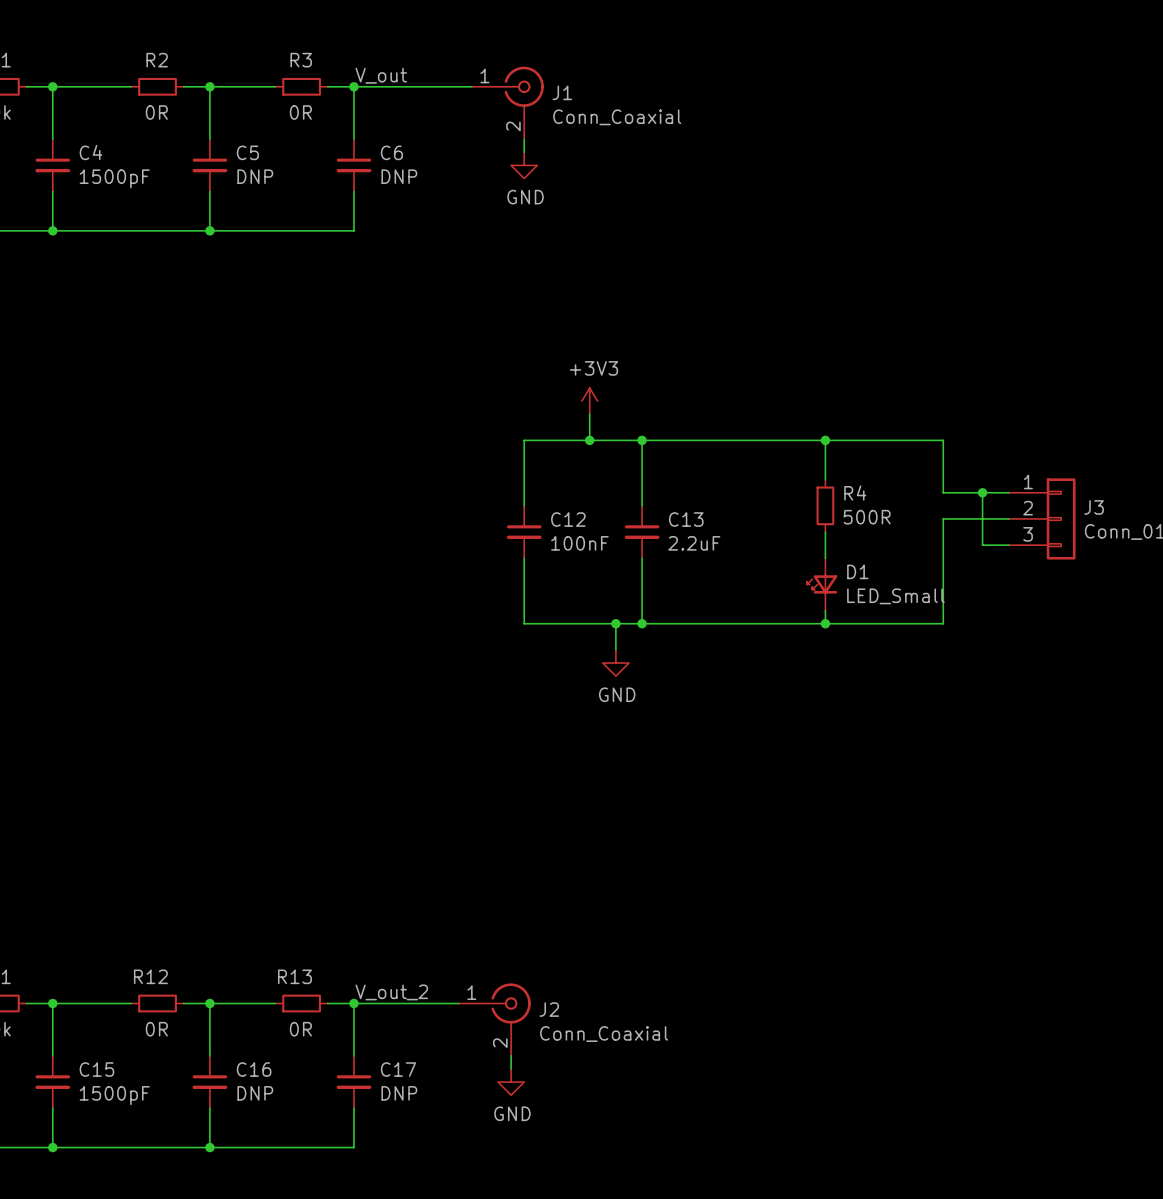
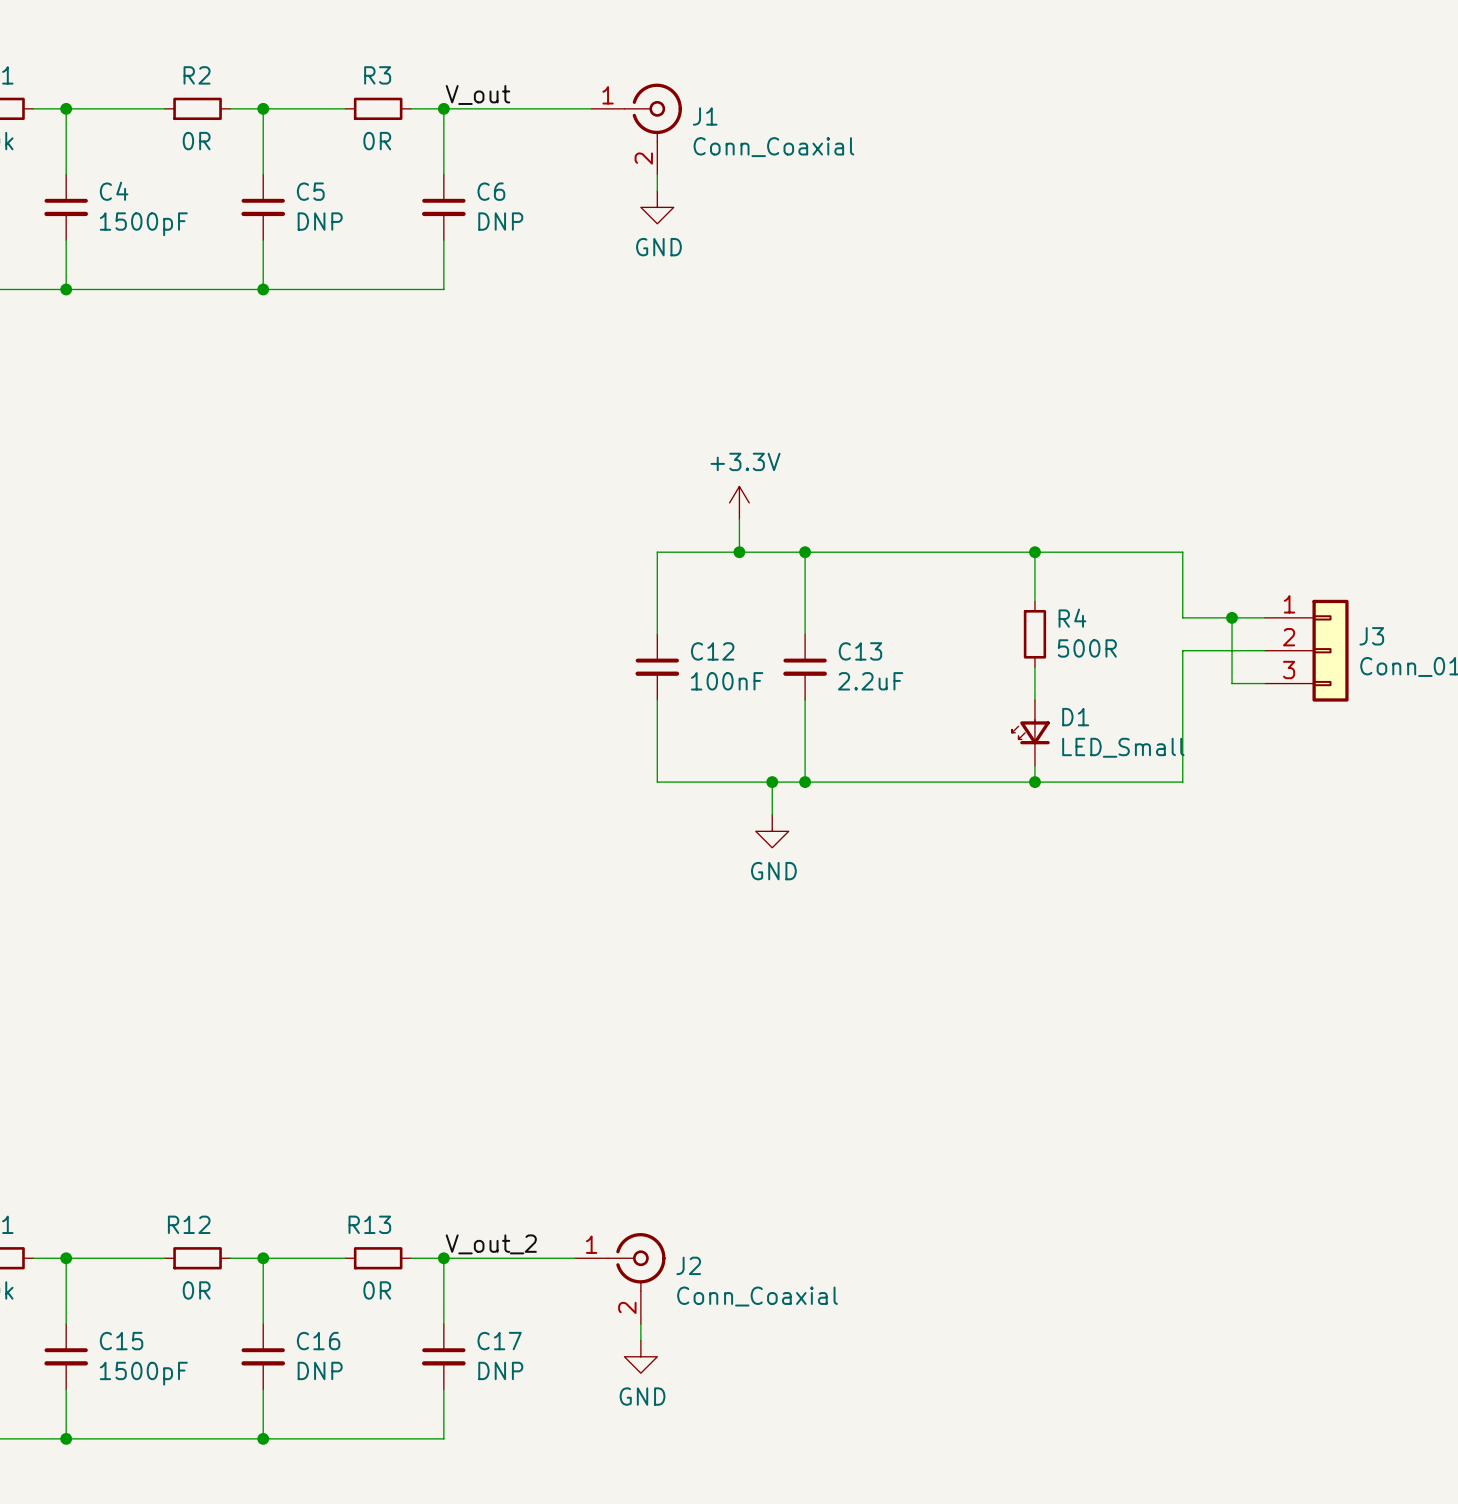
power symbol: +3V3 (589, 401) -> +3.3V (739, 502)

